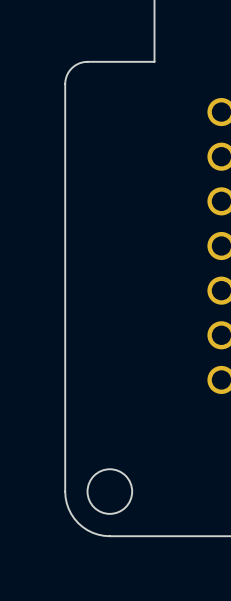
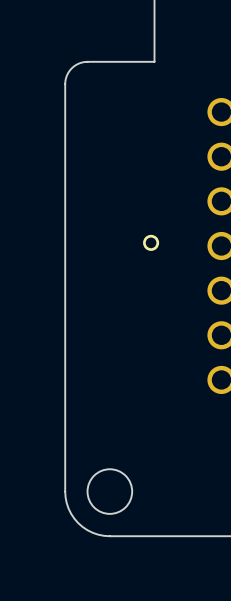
part: none -> (151, 242)

